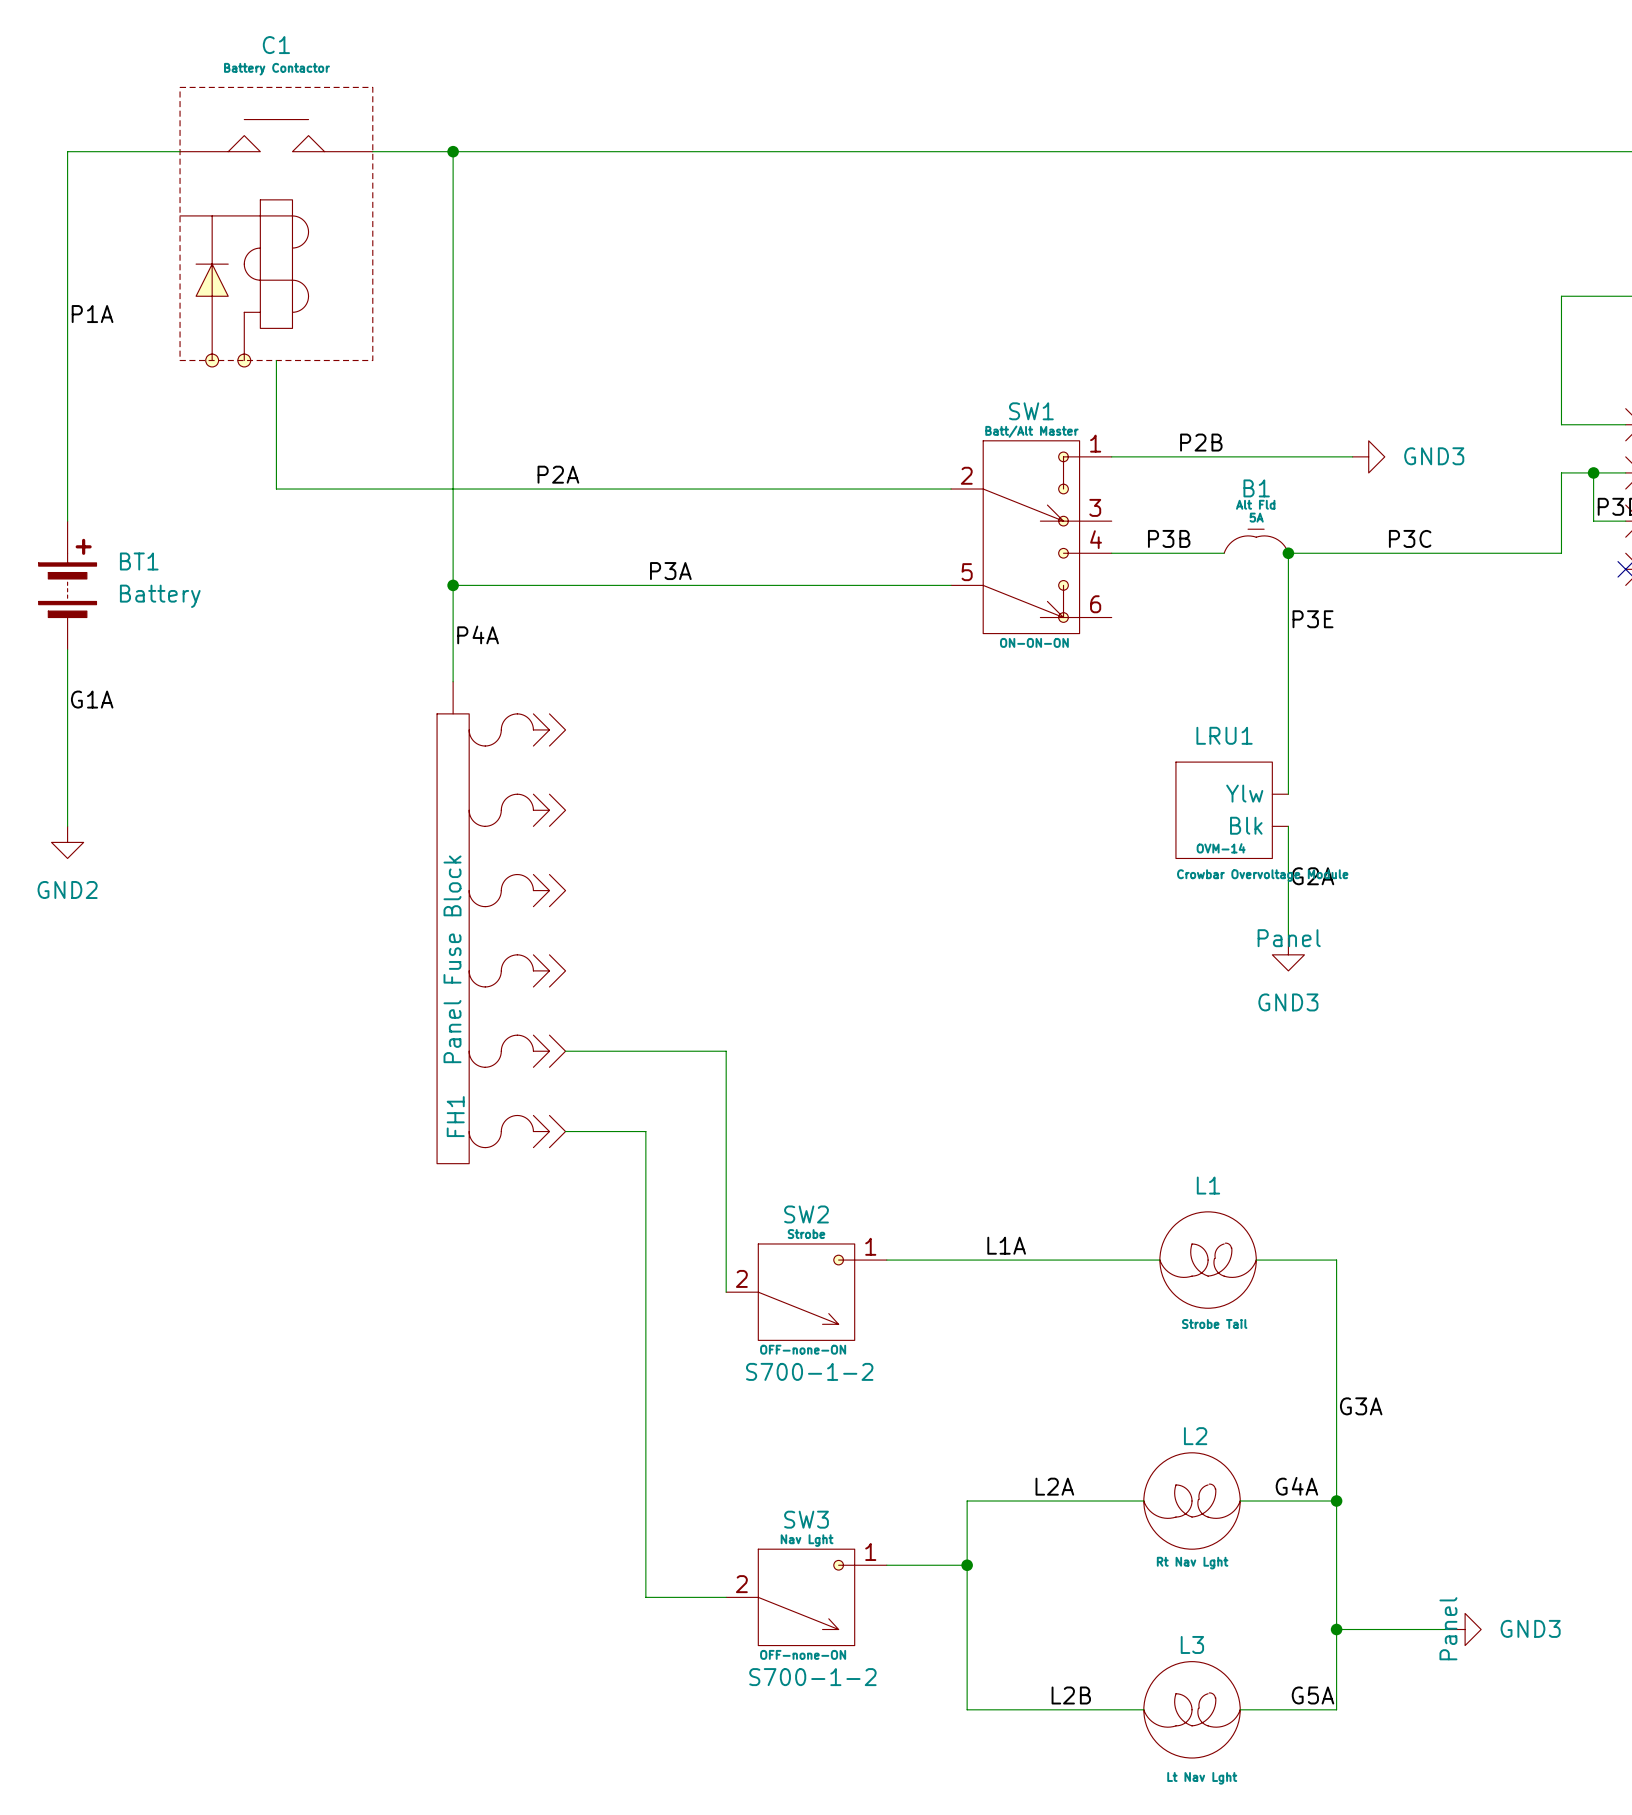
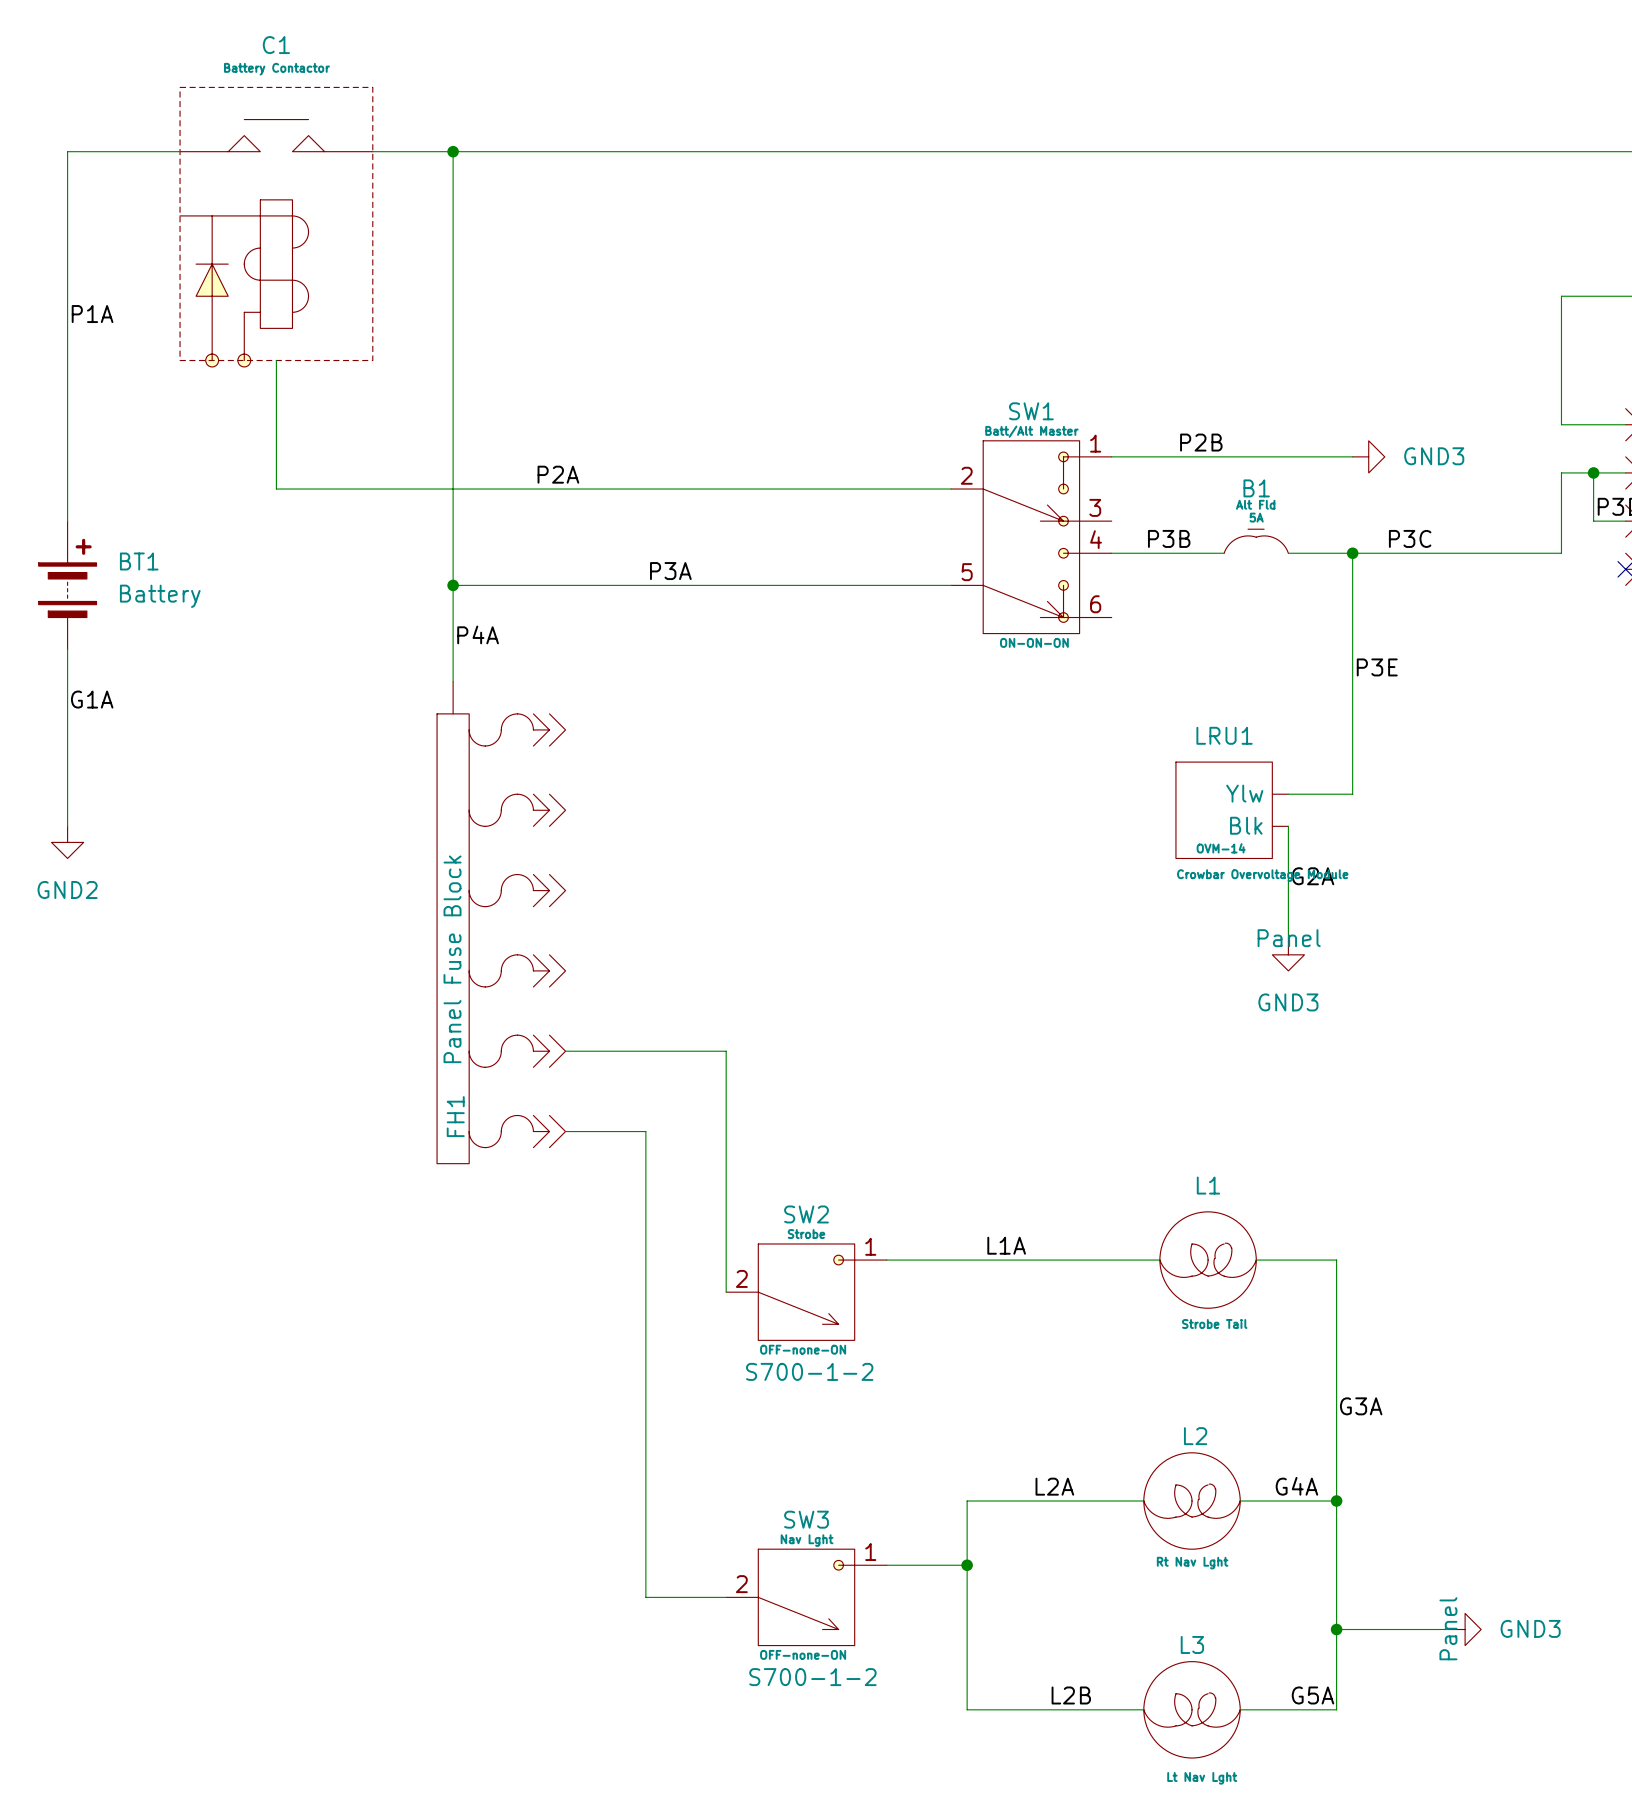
wire: (1288, 553) (1288, 794) -> (1352, 553) (1352, 794) (1288, 794)
junction position: (1288, 553) -> (1352, 553)
label position: P3E (1313, 619) -> P3E (1377, 667)

